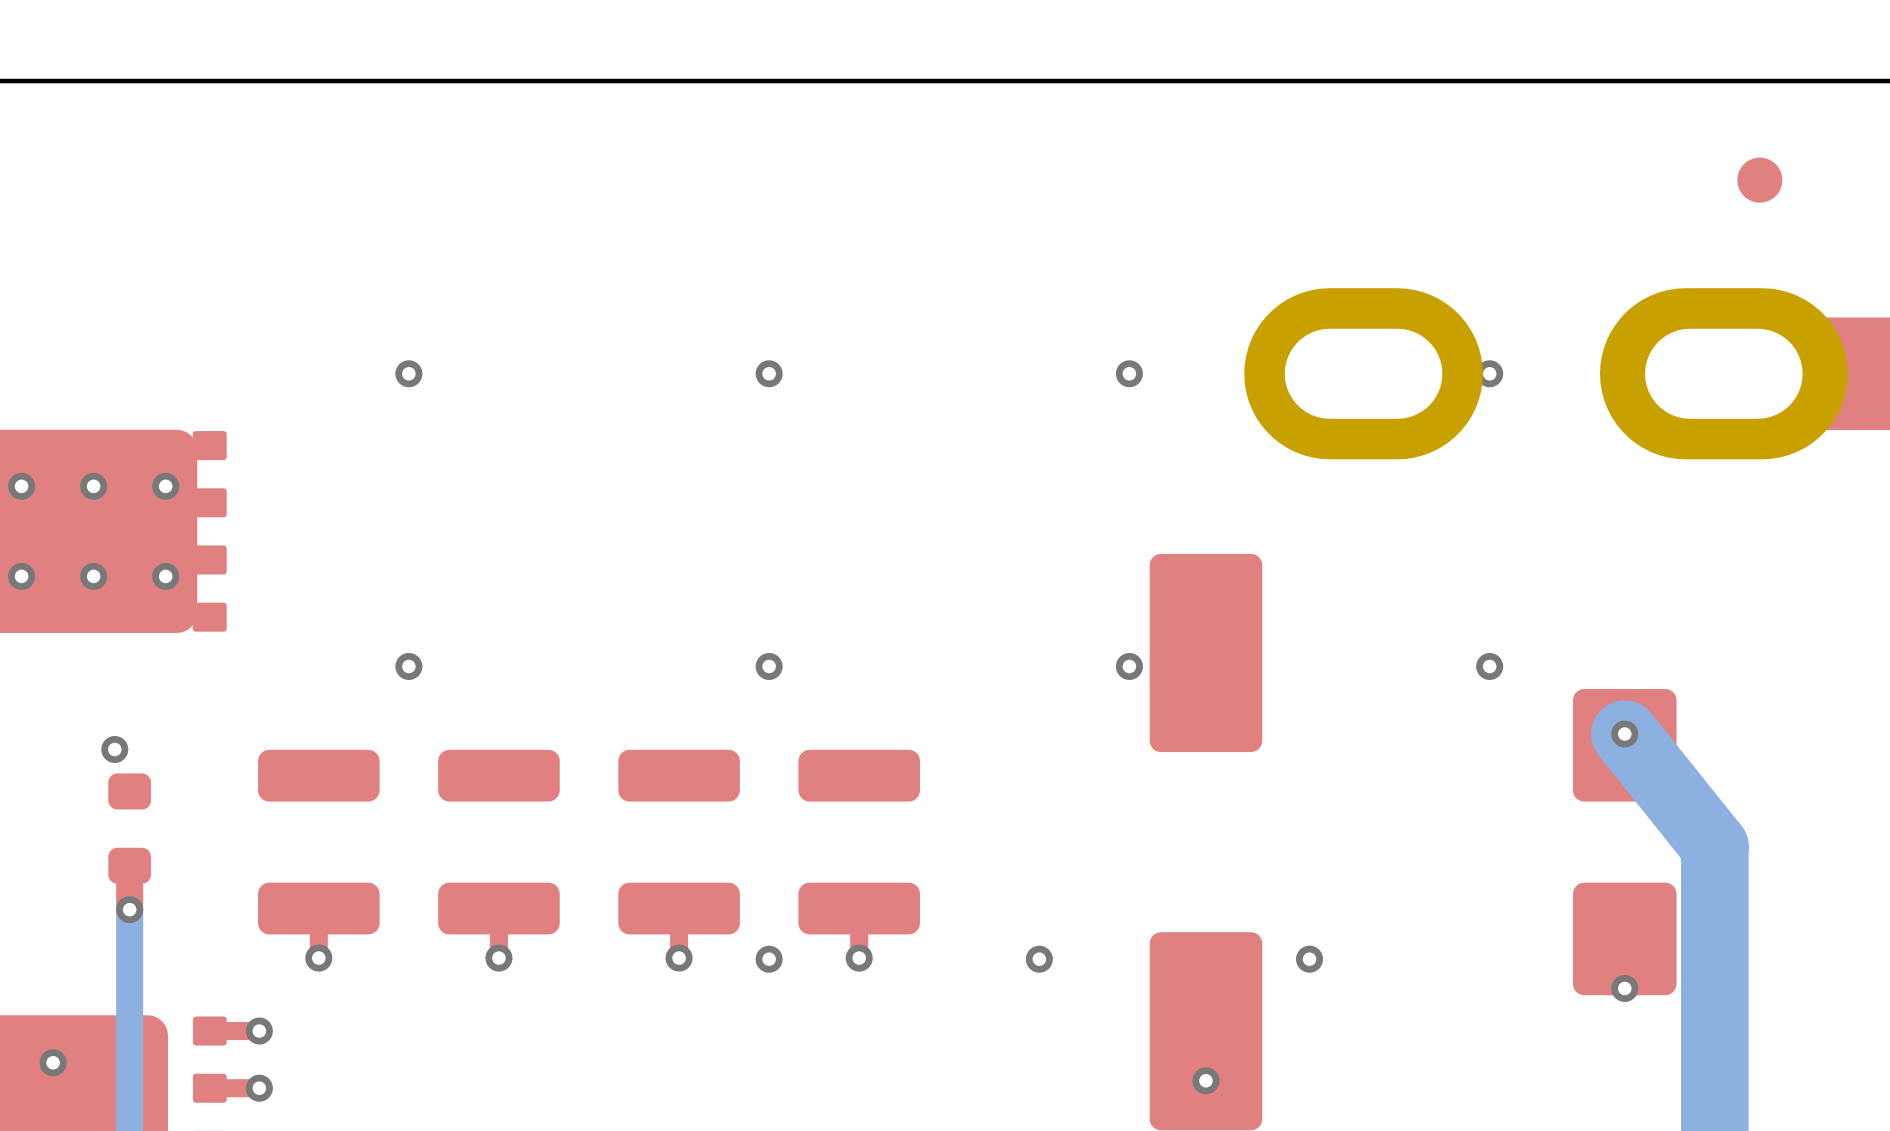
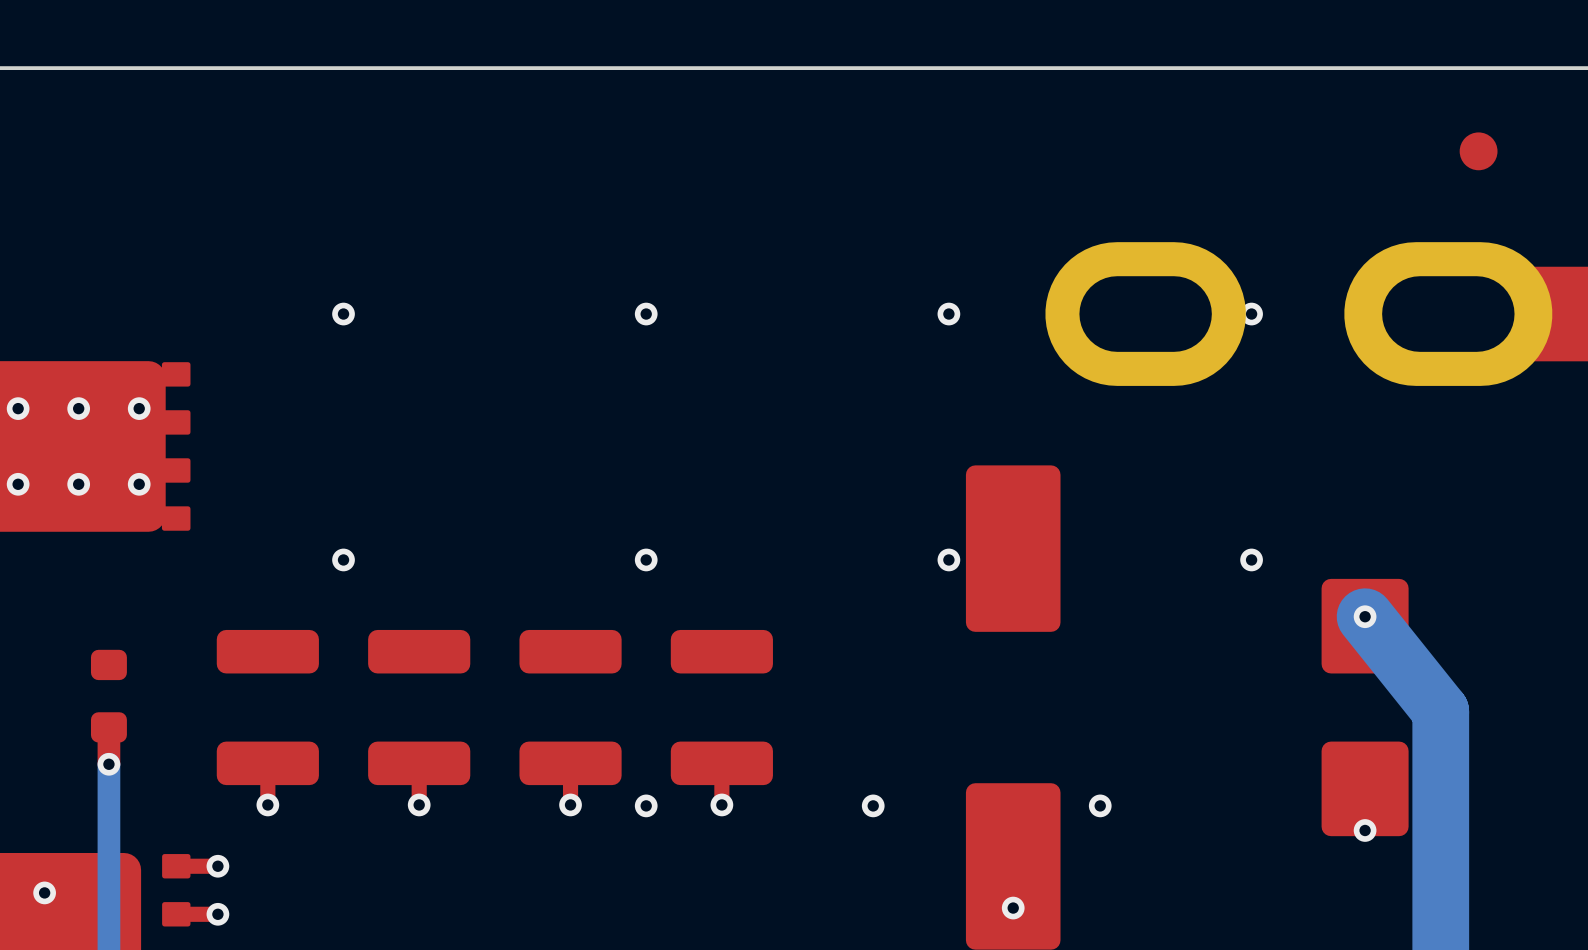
via: (114, 749) -> none

